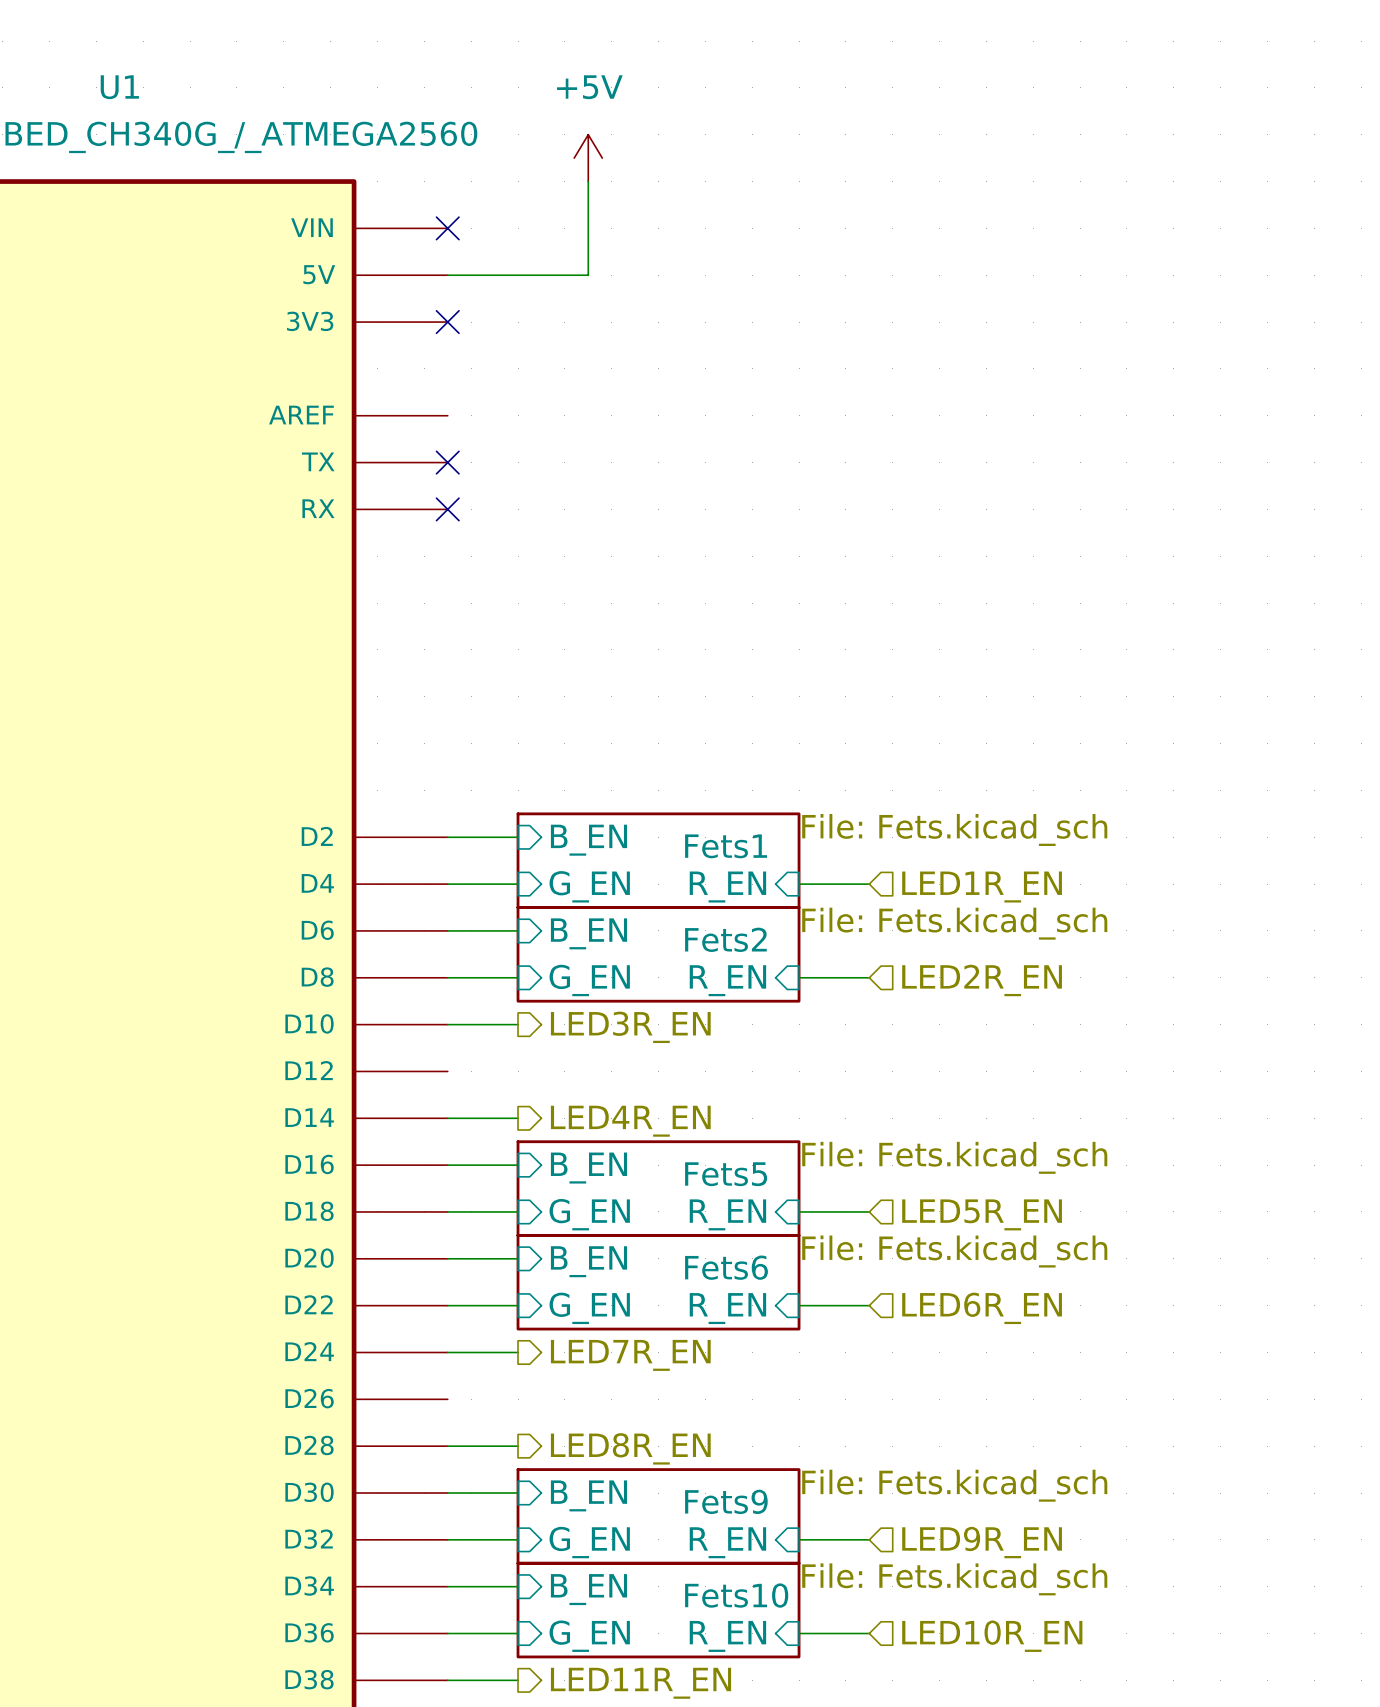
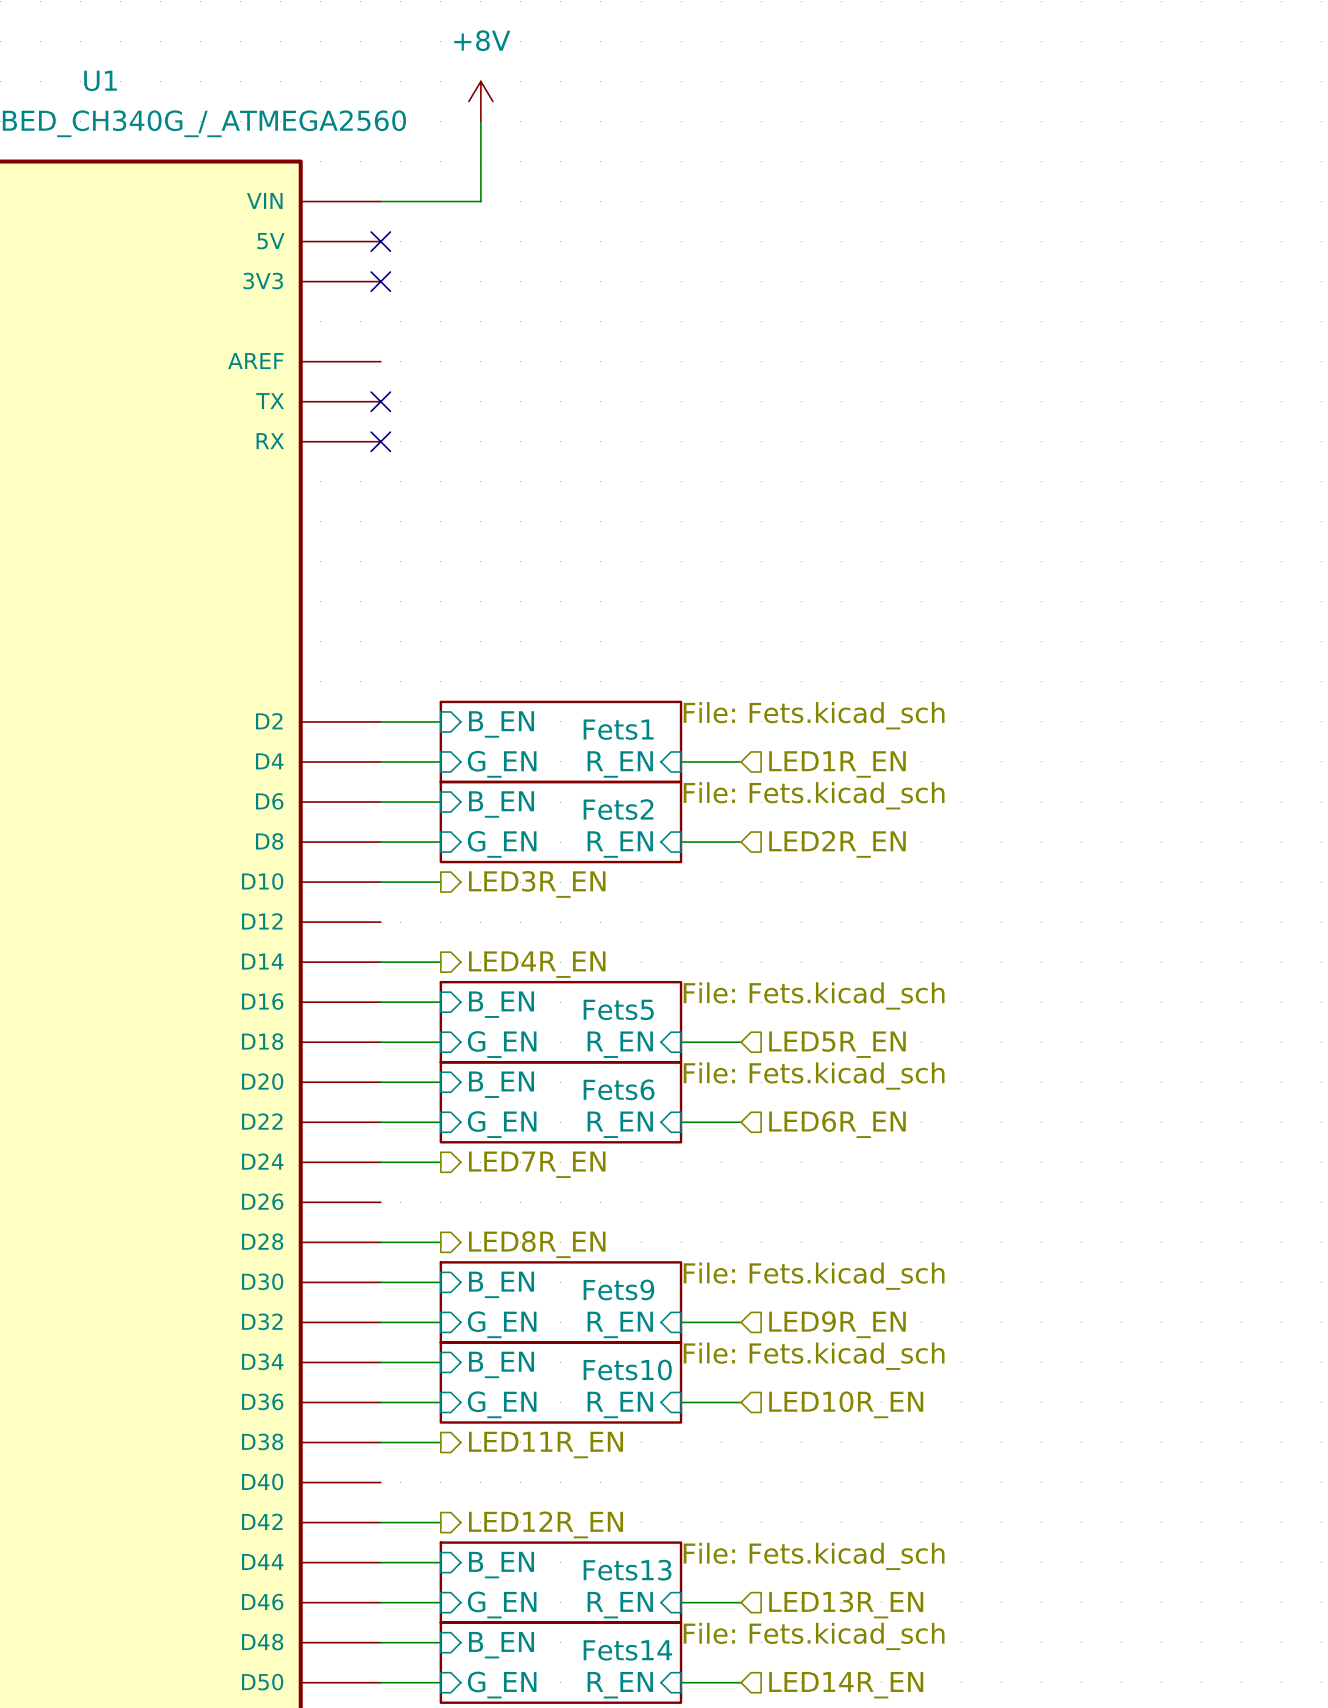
power symbol: none -> +8V (480, 101)
wire: none -> (480, 121) (480, 201) (380, 201)
power symbol: +5V (588, 158) -> none
wire: (588, 181) (588, 275) (447, 275) -> none
no-connect mark position: (447, 228) -> (380, 241)

